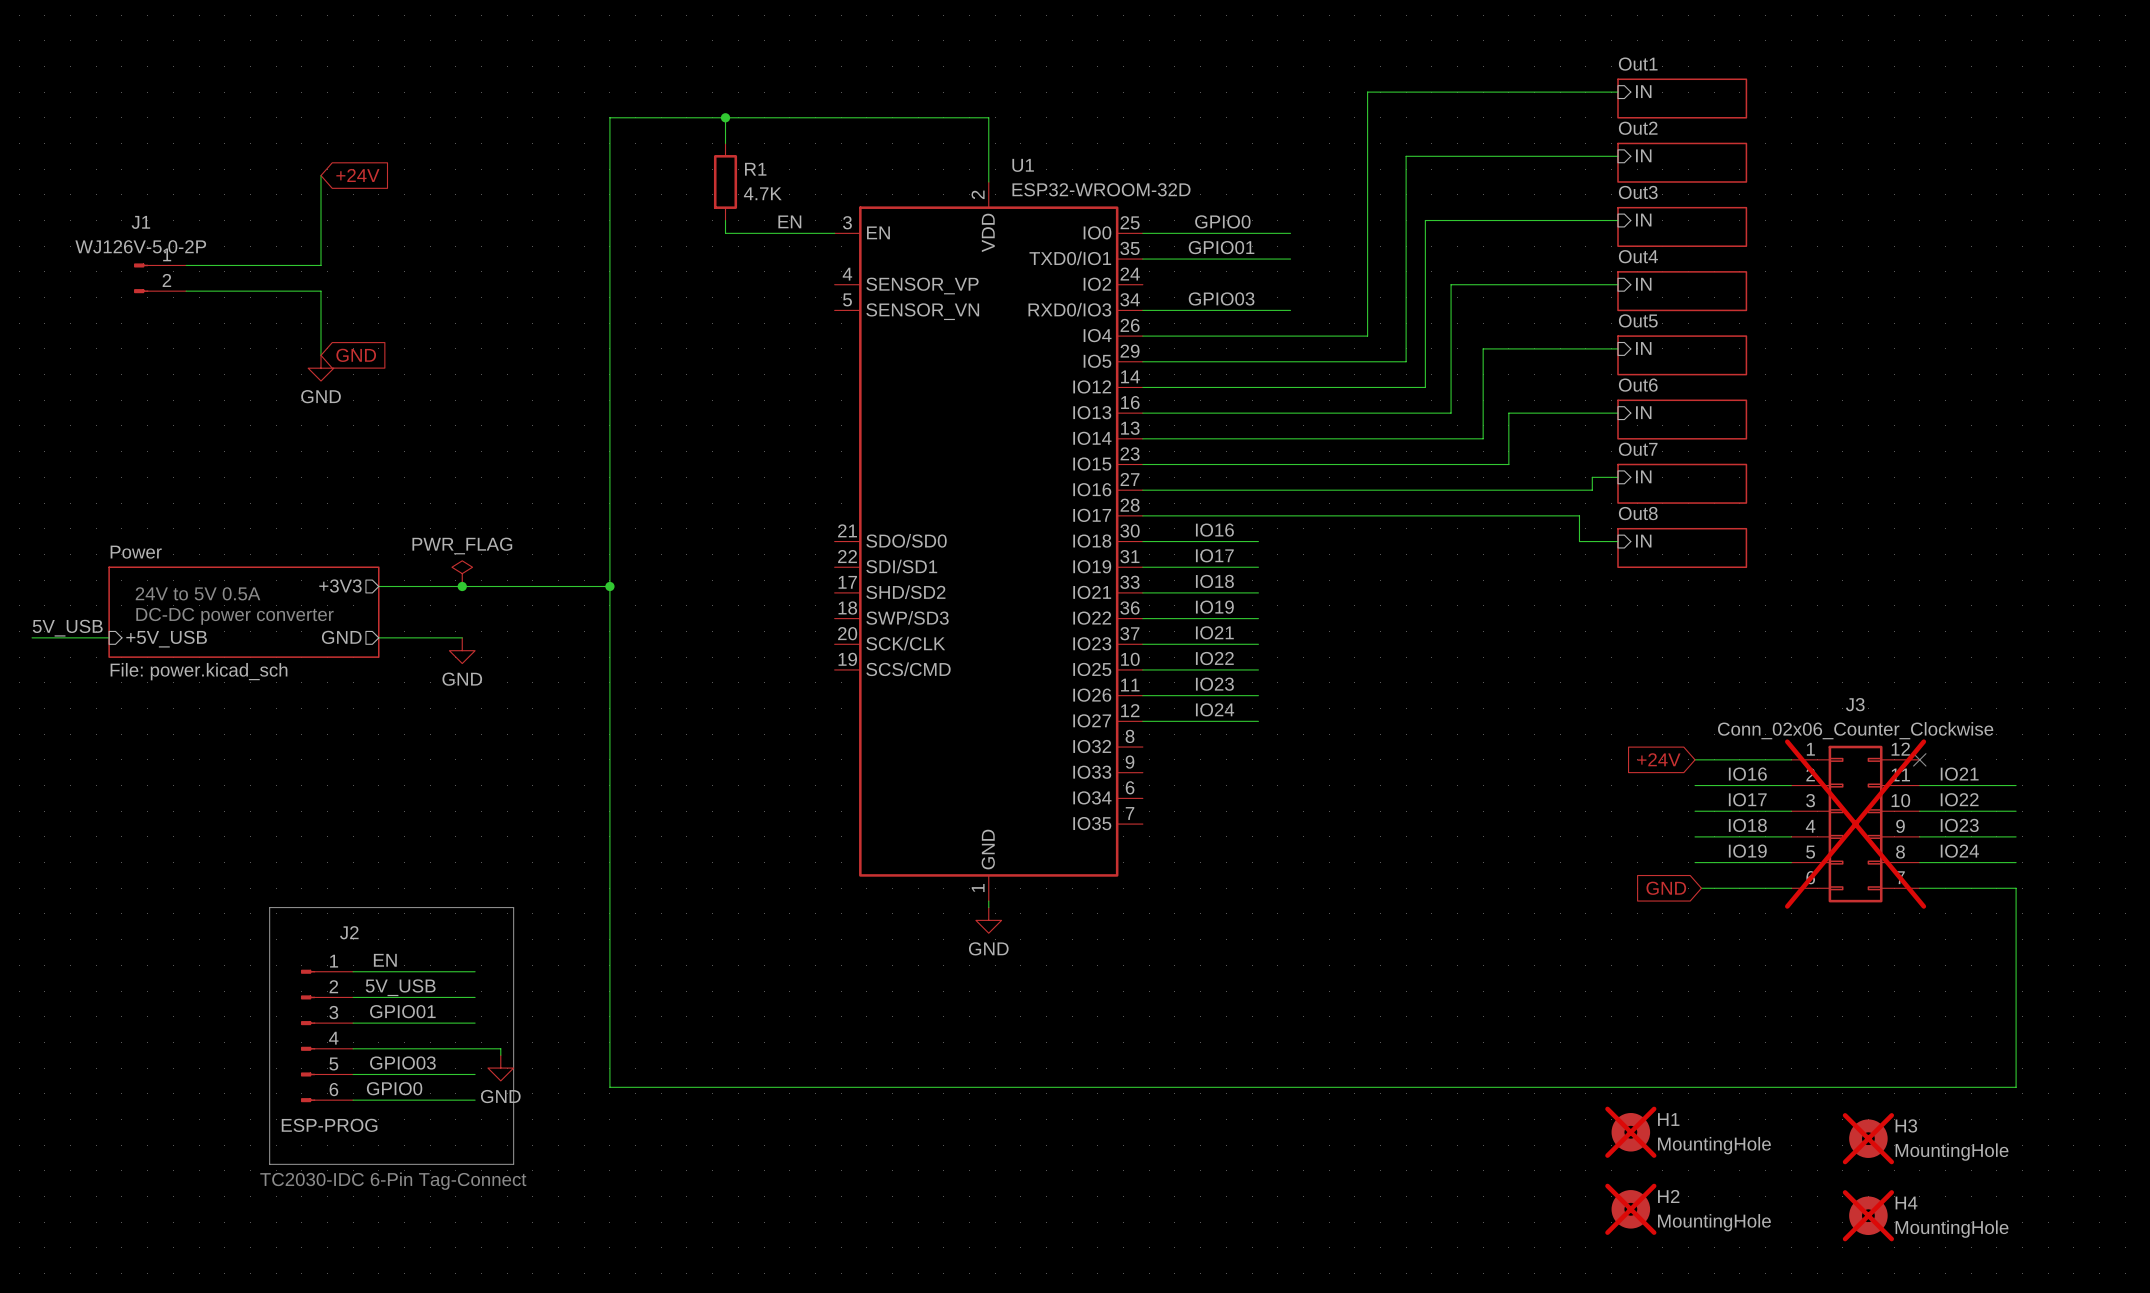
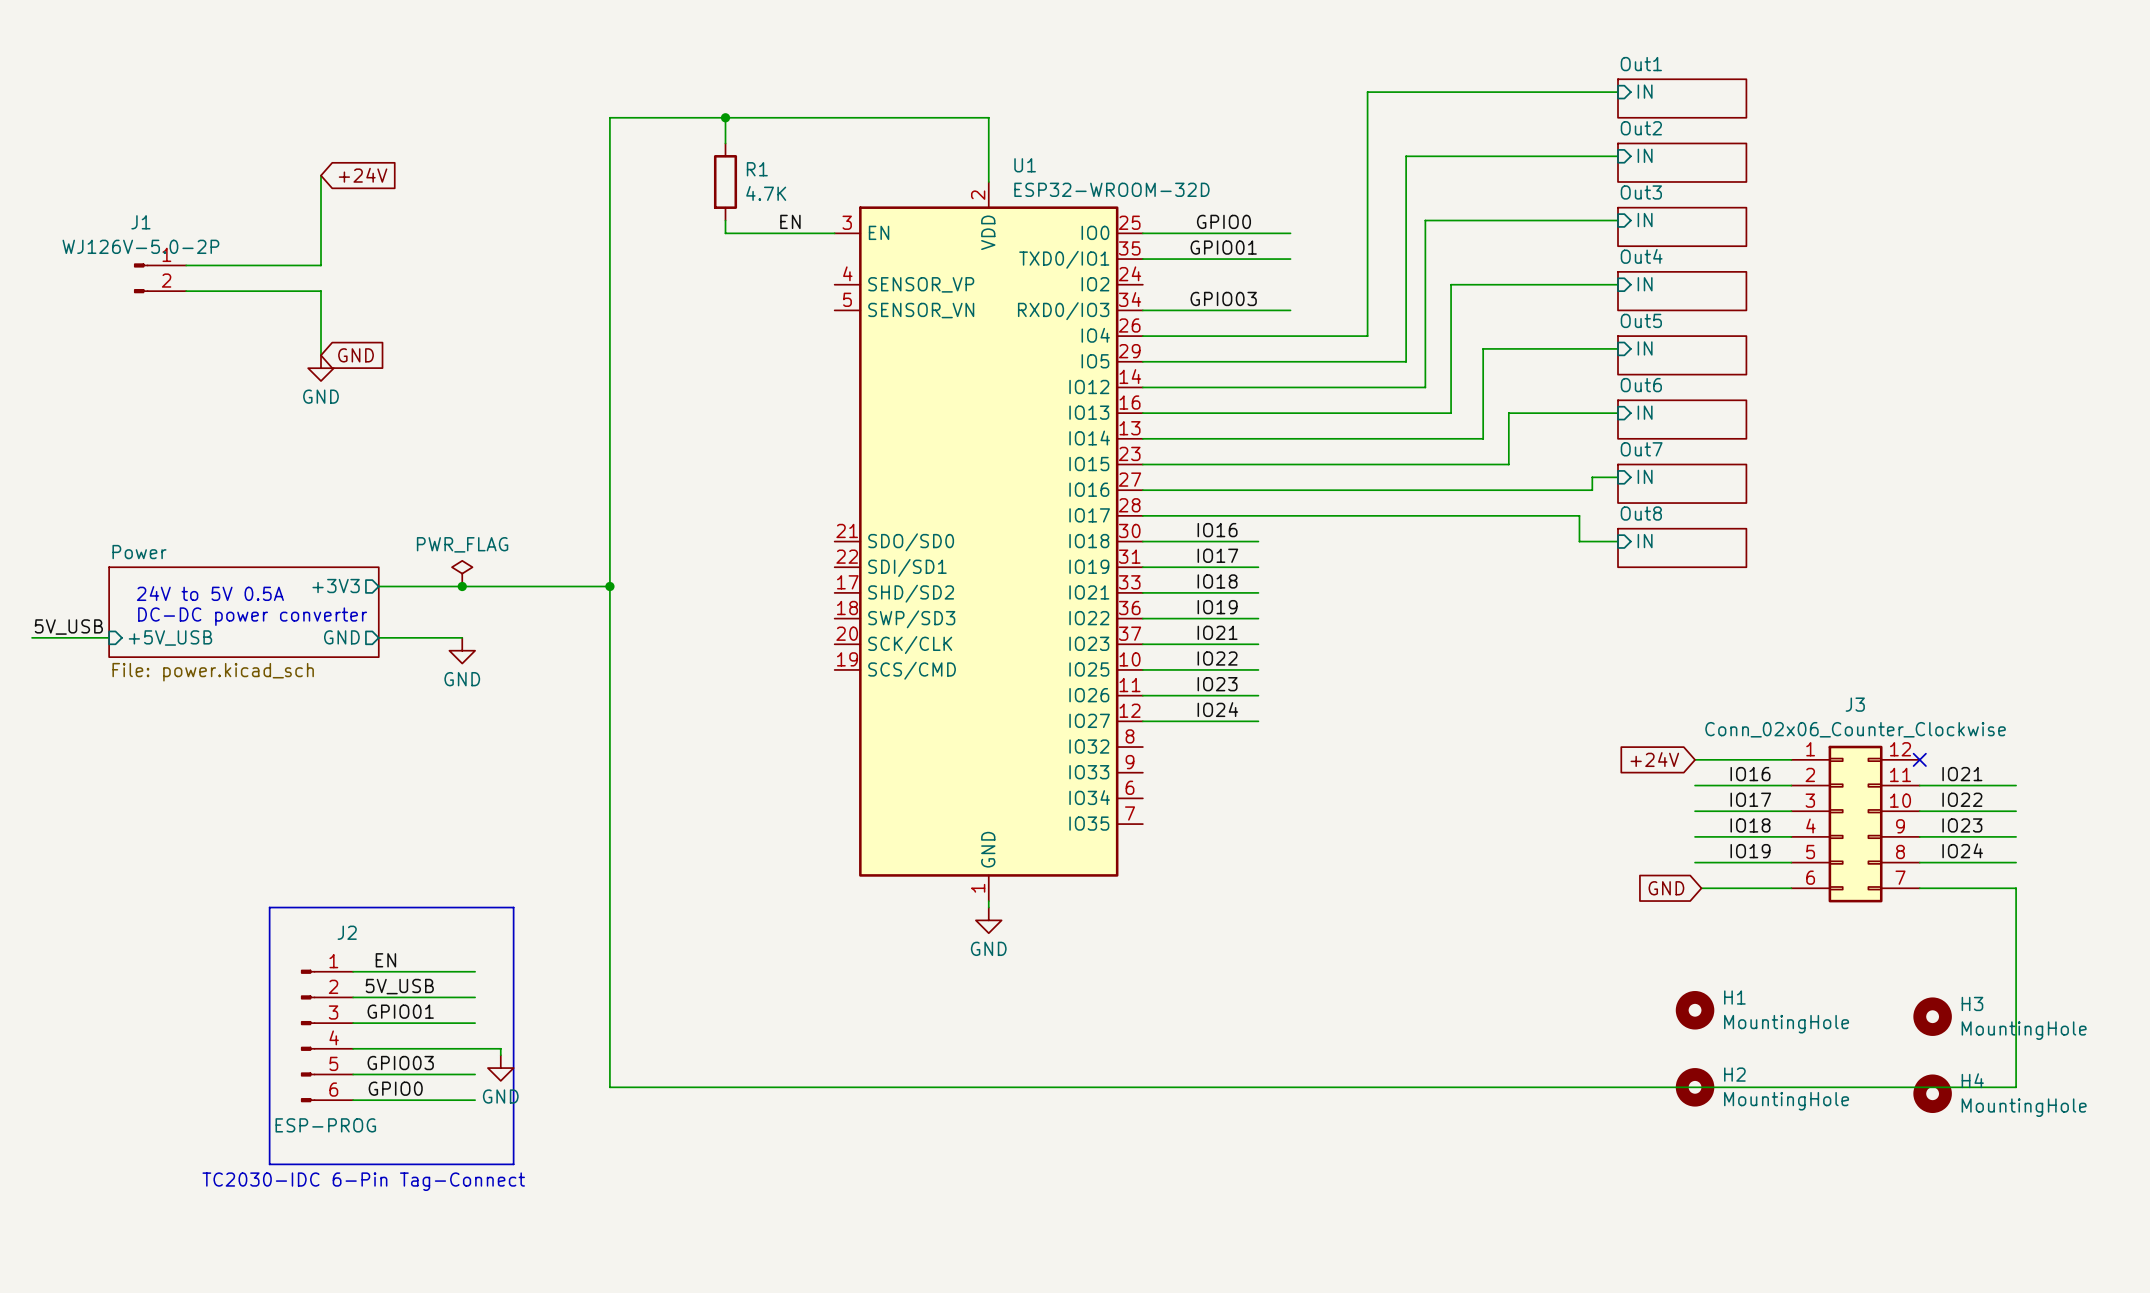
J3 do-not-place cross: (1855, 824) -> none
H1 position: (1630, 1132) -> (1695, 1010)
H1 do-not-place cross: (1630, 1132) -> none
H3 position: (1868, 1138) -> (1932, 1016)
H3 do-not-place cross: (1868, 1138) -> none
H2 position: (1630, 1209) -> (1695, 1087)
H2 do-not-place cross: (1630, 1209) -> none
H4 position: (1868, 1215) -> (1932, 1093)
H4 do-not-place cross: (1868, 1215) -> none

